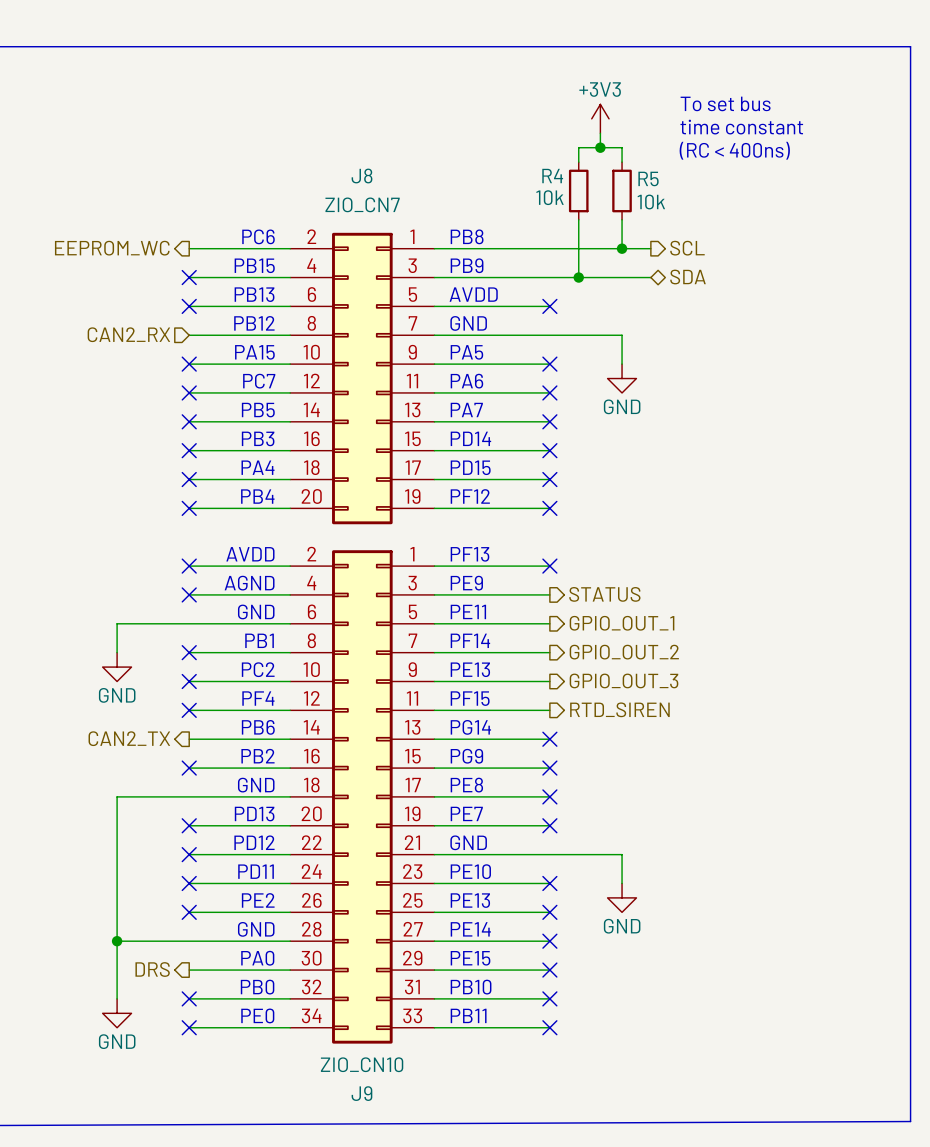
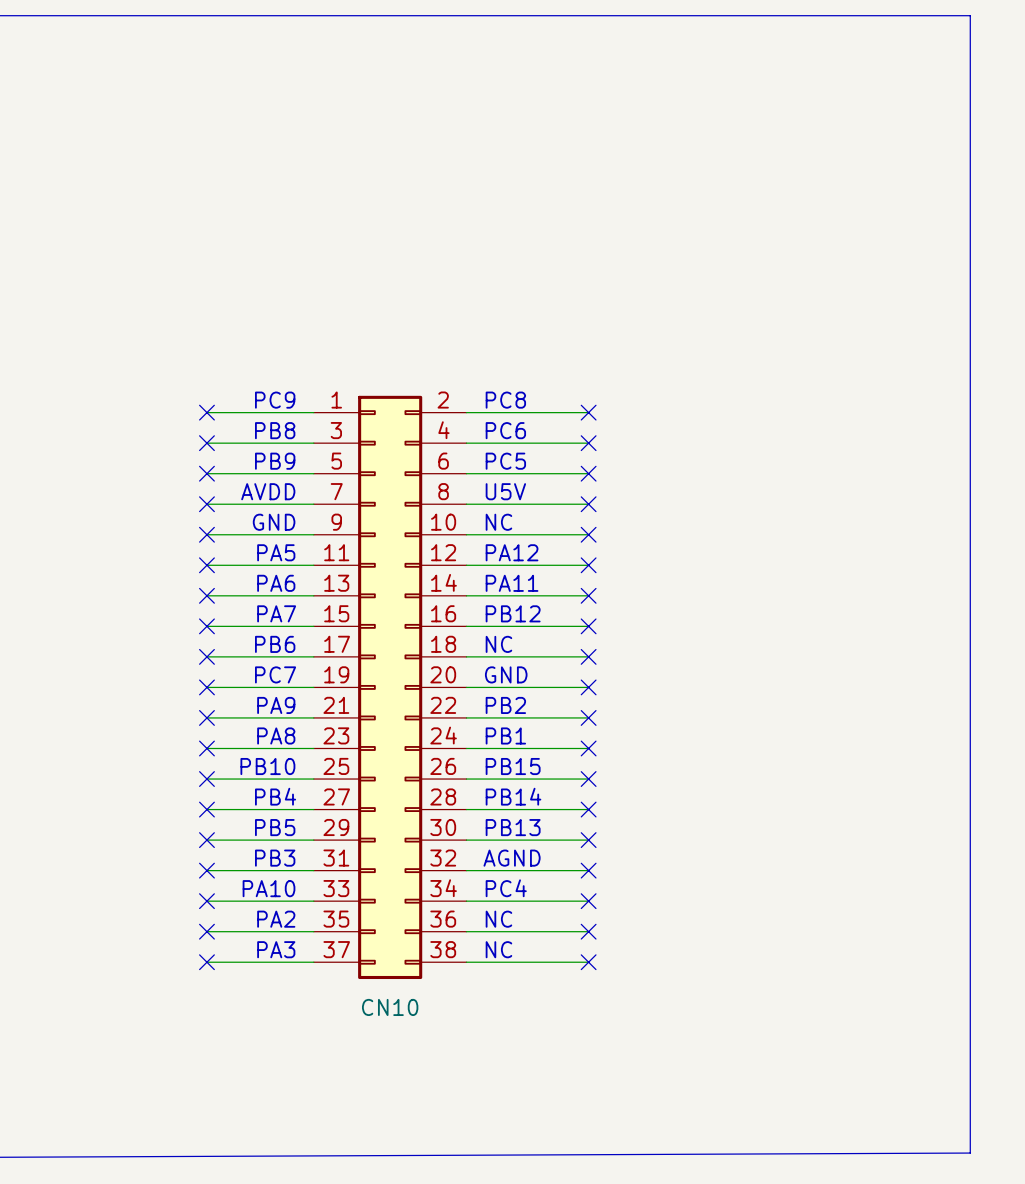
text: To set bus (725, 103) -> none
power symbol: +3V3 (600, 118) -> none
text: time constant (741, 127) -> none
wire: (600, 133) (600, 147) -> none
junction: (600, 147) -> none
text: (RC < 400ns) (734, 150) -> none
wire: (578, 162) (578, 147) (622, 147) (622, 162) -> none
R4: 10k (578, 190) -> none
R5: 10k (622, 190) -> none
wire: (578, 219) (578, 277) -> none
wire: (622, 219) (622, 248) -> none
text: PC6 (258, 236) -> none
text: PB8 (467, 236) -> none
hierarchical label: EEPROM_WC (112, 248) -> none
wire: (189, 248) (290, 248) -> none
wire: (434, 248) (650, 248) -> none
junction: (622, 248) -> none
hierarchical label: SCL (687, 248) -> none
text: PB15 (254, 265) -> none
text: PB9 (467, 265) -> none
wire: (189, 277) (290, 277) -> none
no-connect mark: (189, 277) -> none
wire: (434, 277) (650, 277) -> none
junction: (578, 277) -> none
hierarchical label: SDA (688, 277) -> none
text: PB13 (254, 294) -> none
text: AVDD (473, 294) -> none
wire: (189, 306) (290, 306) -> none
no-connect mark: (189, 306) -> none
wire: (434, 306) (549, 306) -> none
no-connect mark: (549, 306) -> none
text: PB12 (254, 323) -> none
text position: GND (468, 323) -> GND (274, 522)
hierarchical label: CAN2_RX (128, 334) -> none
wire: (189, 335) (290, 335) -> none
wire: (434, 335) (622, 335) (622, 364) -> none
text: PA15 (254, 352) -> none
text: PA5 (466, 352) -> none
wire: (189, 364) (290, 364) -> none
no-connect mark: (189, 364) -> none
wire: (434, 364) (549, 364) -> none
no-connect mark: (549, 364) -> none
J8: ZIO_CN7 (362, 378) -> none
power symbol: GND (622, 378) -> none
text: PC7 (259, 381) -> none
text: PA6 (466, 381) -> none
wire: (189, 392) (290, 392) -> (206, 534) (313, 534)
no-connect mark: (189, 392) -> none
wire: (434, 392) (549, 392) -> (466, 534) (588, 534)
no-connect mark: (549, 392) -> none
text: PA7 (466, 409) -> PC8 (505, 400)
text: PB5 (258, 410) -> PC9 (275, 400)
text: PB3 (258, 438) -> PB8 (275, 430)
text: PD14 (470, 438) -> PC6 (505, 430)
text: PA4 (258, 467) -> PB9 (275, 461)
text: PD15 (470, 467) -> PC5 (505, 461)
text: PB4 (257, 496) -> AVDD (268, 491)
text: PF12 (470, 496) -> U5V (505, 491)
text: none -> NC (498, 522)
no-connect mark: none -> (206, 534)
no-connect mark: none -> (588, 534)
text: AVDD (250, 554) -> PA5 (276, 552)
text: PF13 (470, 554) -> PA12 (512, 552)
text: AGND (249, 583) -> PA6 (276, 583)
text: PE9 (466, 583) -> PA11 (512, 583)
no-connect mark: none -> (588, 595)
hierarchical label: STATUS (604, 594) -> none
text: GND (256, 611) -> PA7 (276, 613)
text: PE11 (468, 611) -> PB12 (513, 613)
wire: (189, 623) (117, 623) (117, 652) -> none
no-connect mark: none -> (206, 626)
no-connect mark: none -> (588, 626)
hierarchical label: GPIO_OUT_1 (622, 623) -> none
text: PB1 (259, 640) -> PB6 (275, 644)
text: PF14 (470, 640) -> NC (498, 644)
no-connect mark: none -> (588, 656)
hierarchical label: GPIO_OUT_2 (624, 652) -> none
power symbol: GND (117, 667) -> none
text: PC2 (258, 669) -> PC7 (275, 674)
text: PE13 (470, 669) -> GND (506, 674)
hierarchical label: GPIO_OUT_3 (624, 680) -> none
part: none -> CN10 (390, 687)
no-connect mark: none -> (588, 687)
text: PF4 (258, 698) -> PA9 (276, 705)
text: PF15 (470, 698) -> PB2 (505, 705)
hierarchical label: RTD_SIREN (619, 709) -> none
no-connect mark: none -> (588, 717)
text: PB6 (258, 727) -> PA8 (276, 735)
text: PG14 (470, 727) -> PB1 (505, 735)
hierarchical label: CAN2_TX (129, 738) -> none
no-connect mark: none -> (206, 748)
text: PB2 (257, 756) -> PB10 (267, 766)
text: PG9 (466, 756) -> PB15 (513, 766)
text: GND (256, 785) -> PB4 (275, 796)
text: PE8 (466, 785) -> PB14 (513, 796)
wire: (189, 796) (117, 796) (117, 998) -> none
no-connect mark: none -> (206, 809)
J9: ZIO_CN10 (362, 796) -> none
text: PE7 (466, 813) -> PB13 (513, 827)
text: PD13 (254, 814) -> PB5 (275, 827)
text: PD12 (254, 842) -> PB3 (275, 858)
text: GND (468, 842) -> AGND (512, 858)
wire: (549, 854) (622, 854) (622, 883) -> none
no-connect mark: none -> (588, 870)
text: PD11 (256, 871) -> PA10 (269, 888)
text: PE10 (470, 871) -> PC4 (506, 888)
power symbol: GND (622, 897) -> none
text: PE2 (258, 900) -> PA2 (276, 919)
text: PE13 (470, 900) -> NC (498, 919)
text: GND (256, 929) -> PA3 (276, 949)
text: PE14 (470, 929) -> NC (498, 949)
wire: (117, 941) (189, 941) -> none
junction: (117, 941) -> none
no-connect mark: none -> (206, 962)
text: PA0 (257, 958) -> none
text: PE15 (470, 958) -> none
hierarchical label: DRS (152, 969) -> none
wire: (189, 970) (290, 970) -> none
wire: (434, 970) (549, 970) -> none
no-connect mark: (549, 970) -> none
text: PB0 (257, 987) -> none
text: PB10 (471, 987) -> none
wire: (189, 998) (290, 998) -> none
no-connect mark: (189, 998) -> none
wire: (434, 998) (549, 998) -> none
no-connect mark: (549, 998) -> none
power symbol: GND (117, 1013) -> none
text: PE0 (257, 1015) -> none
text: PB11 (468, 1015) -> none
wire: (189, 1027) (290, 1027) -> none
no-connect mark: (189, 1027) -> none
wire: (434, 1027) (549, 1027) -> none
no-connect mark: (549, 1027) -> none

